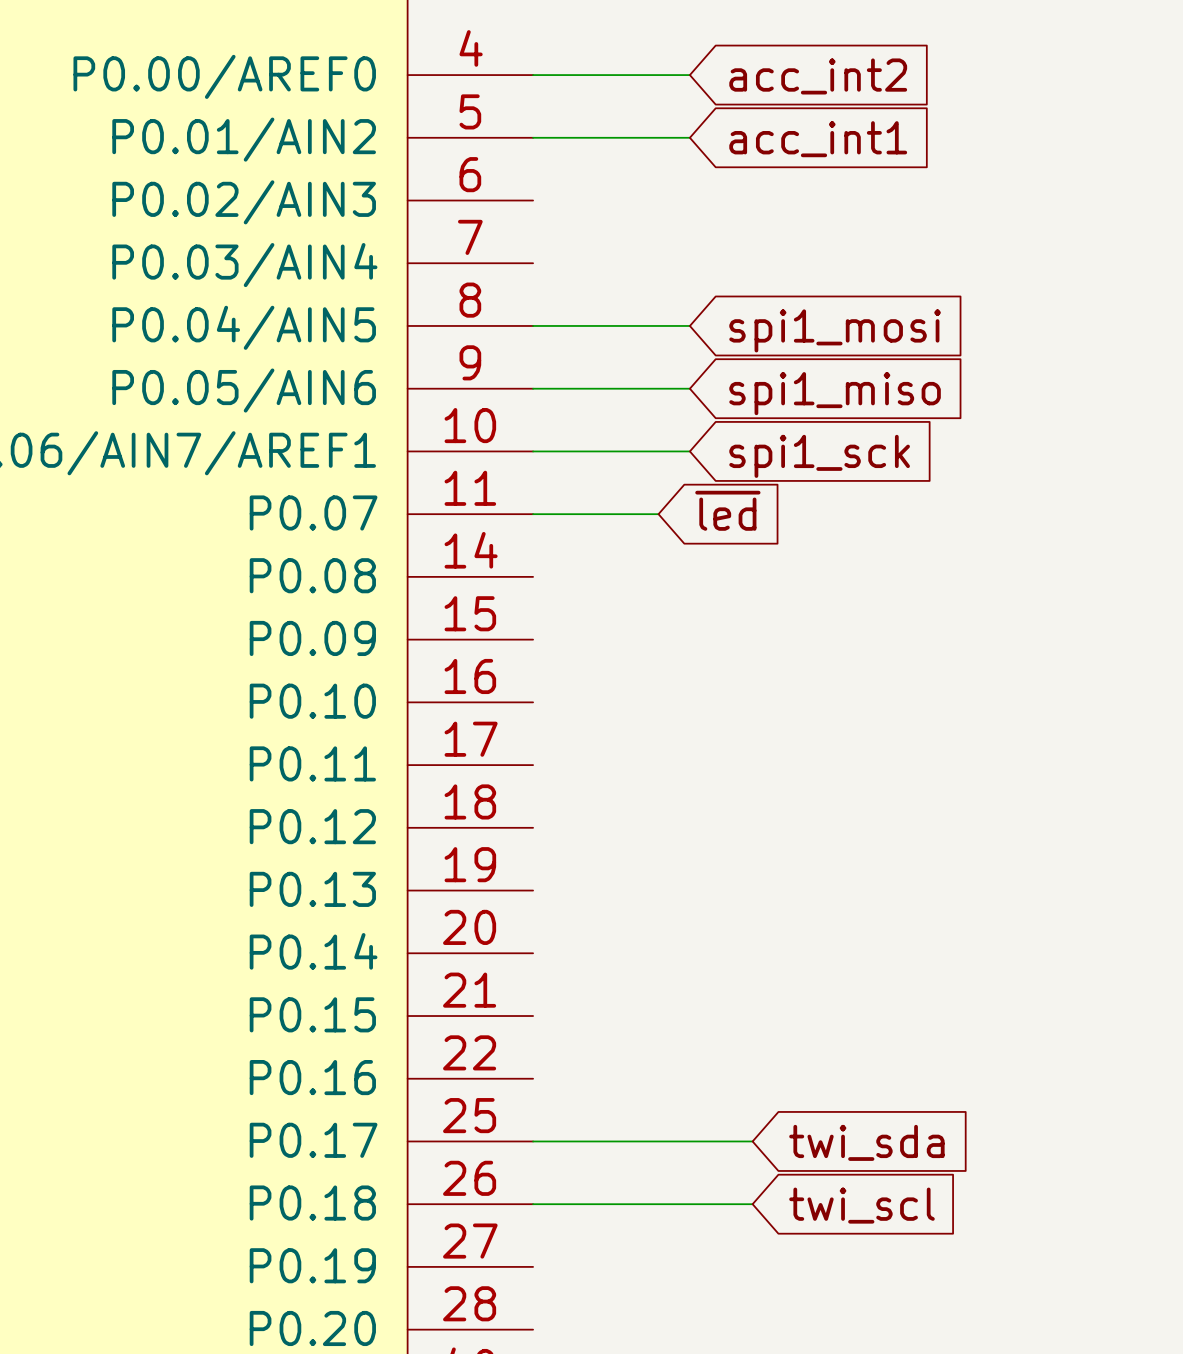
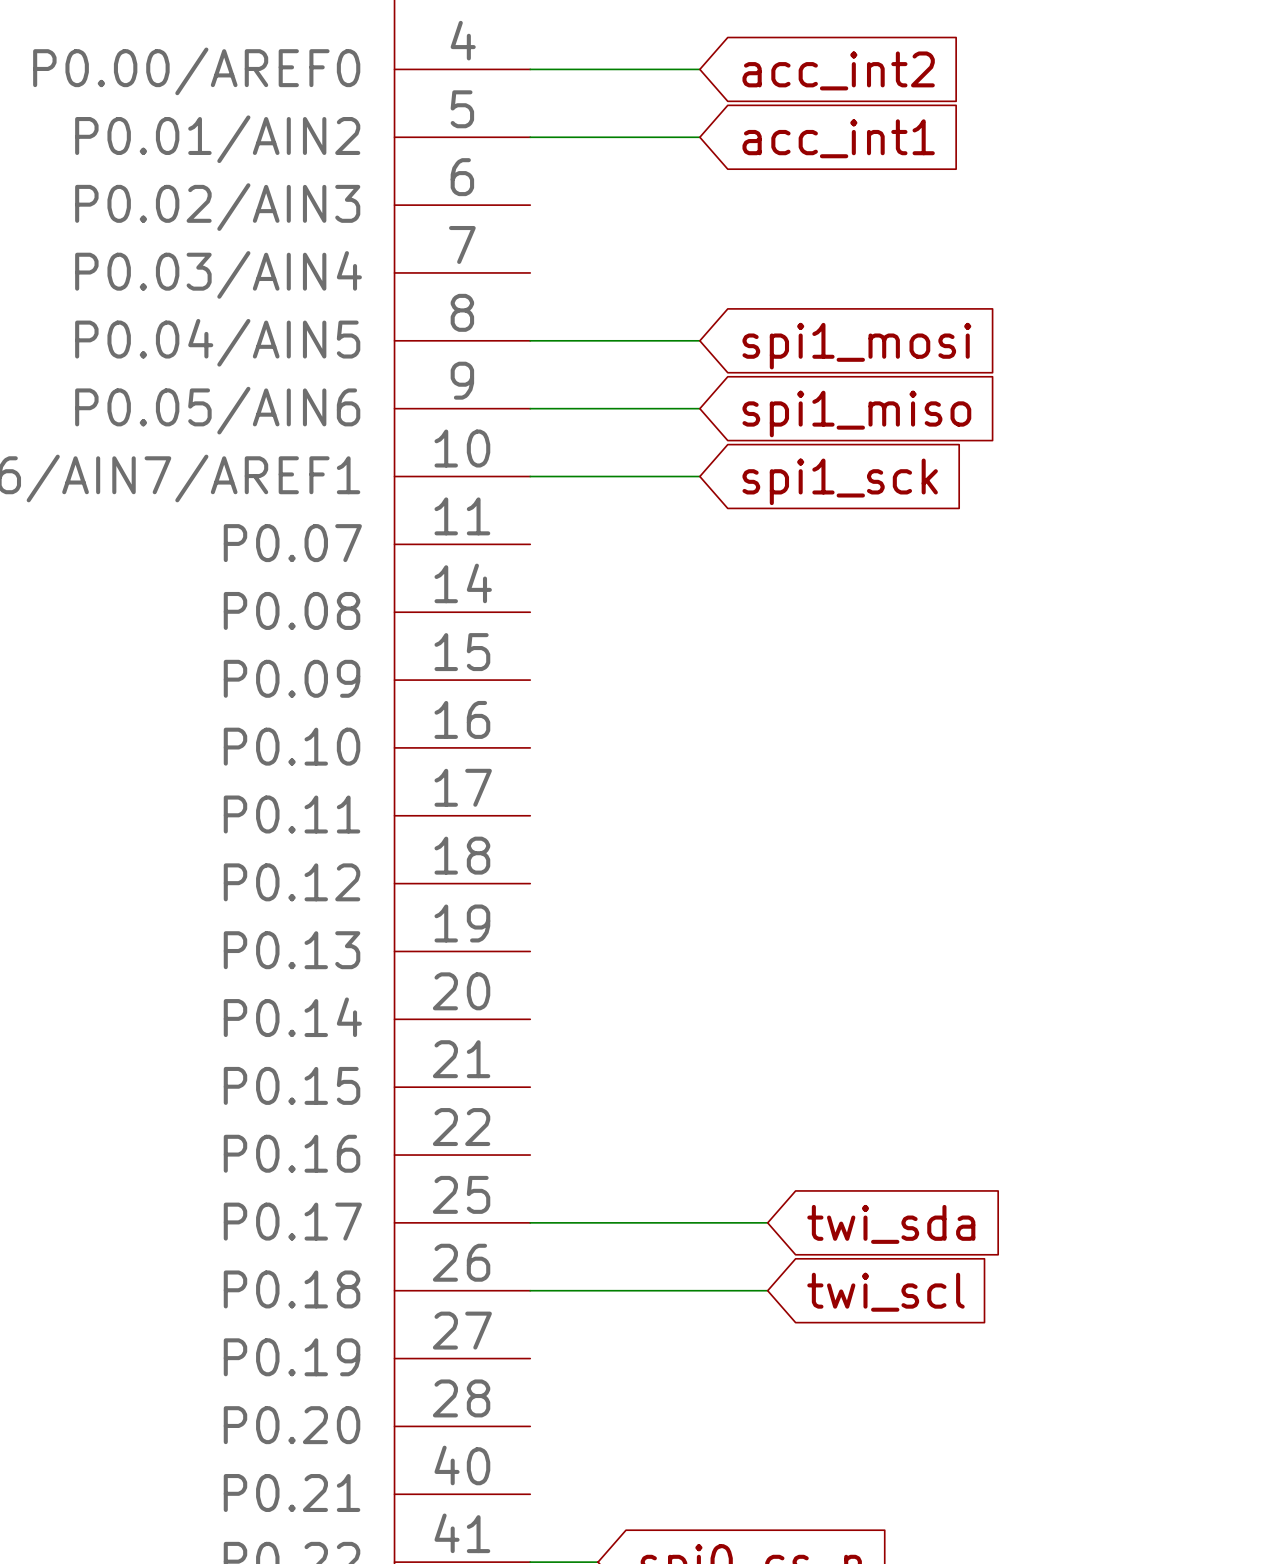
global label: ~{led} (727, 510) -> none
wire: (533, 514) (658, 514) -> none

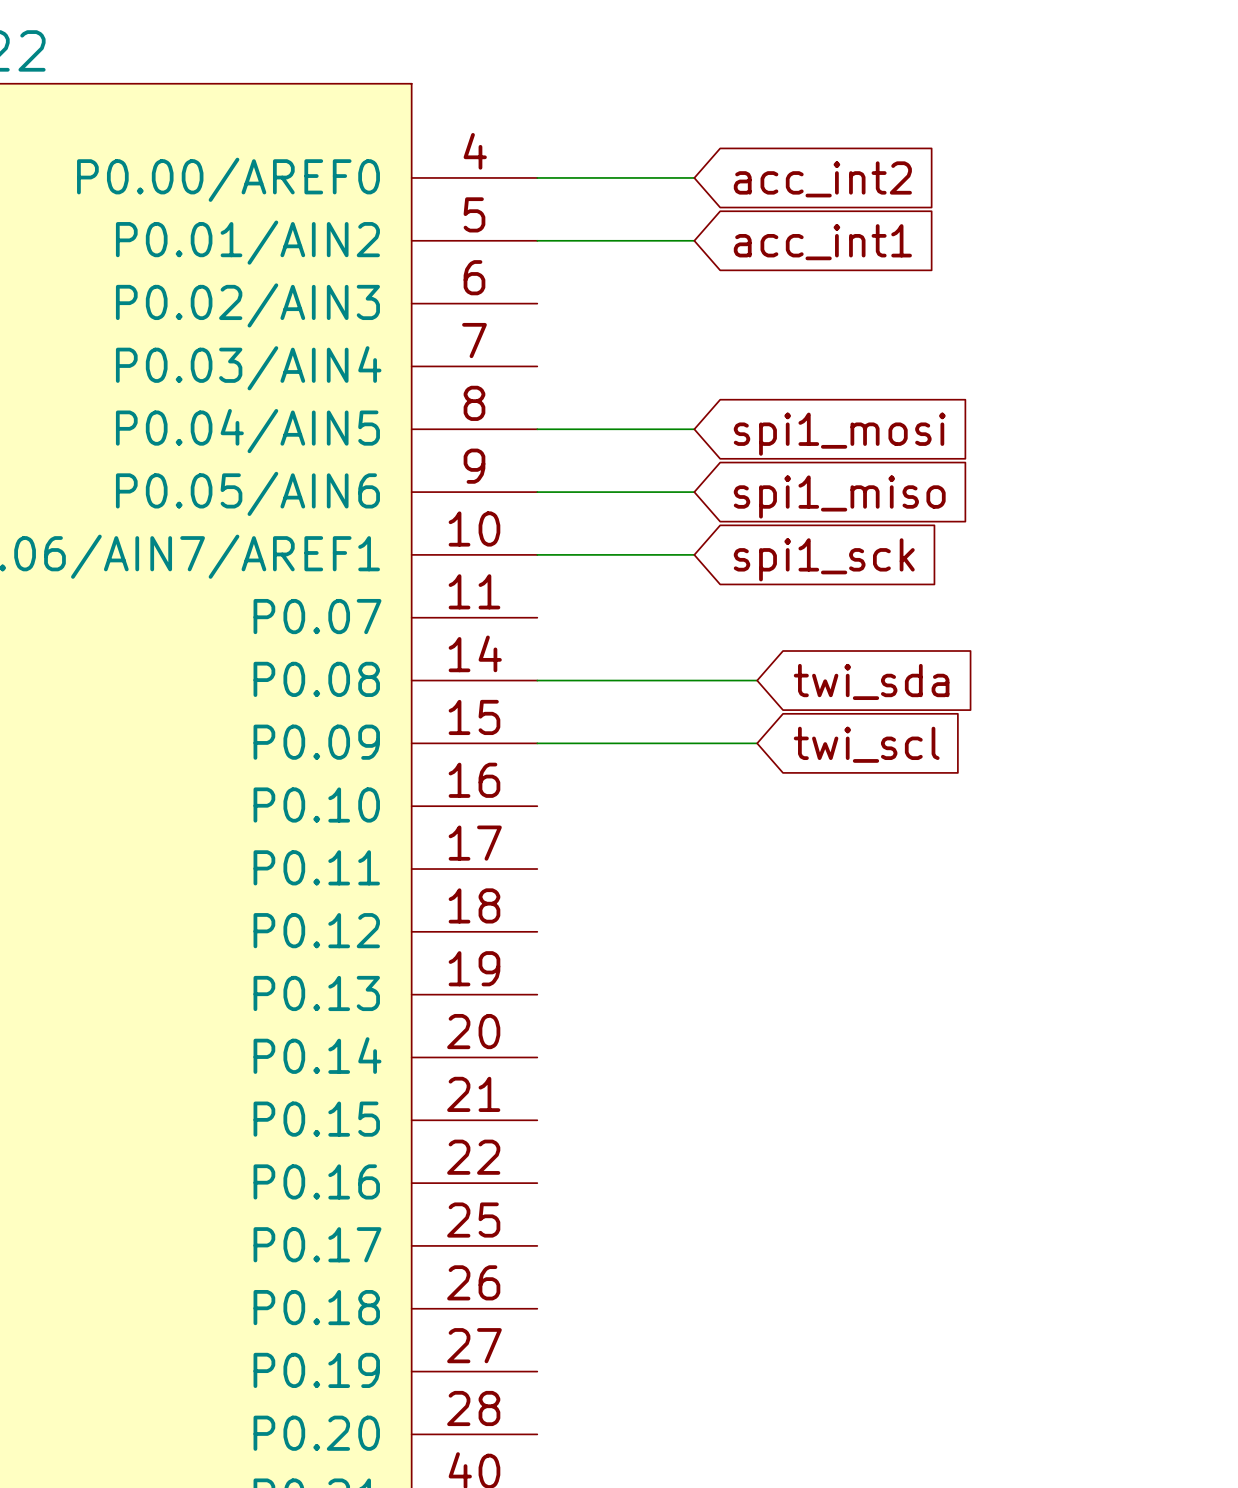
wire: (530, 1222) (767, 1222) -> (537, 680) (757, 680)
global label position: twi_sda (891, 1224) -> twi_sda (871, 681)
wire: (530, 1290) (767, 1290) -> (537, 743) (757, 743)
global label position: twi_scl (885, 1292) -> twi_scl (866, 744)

